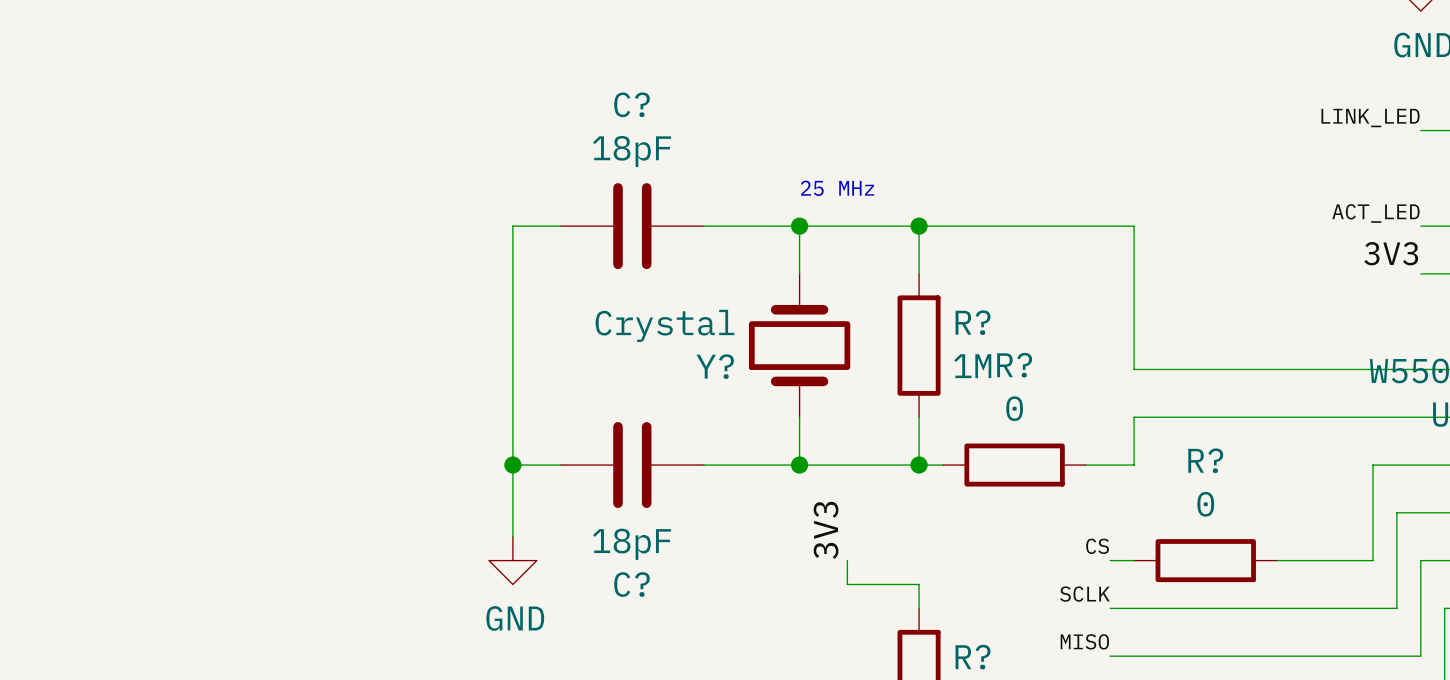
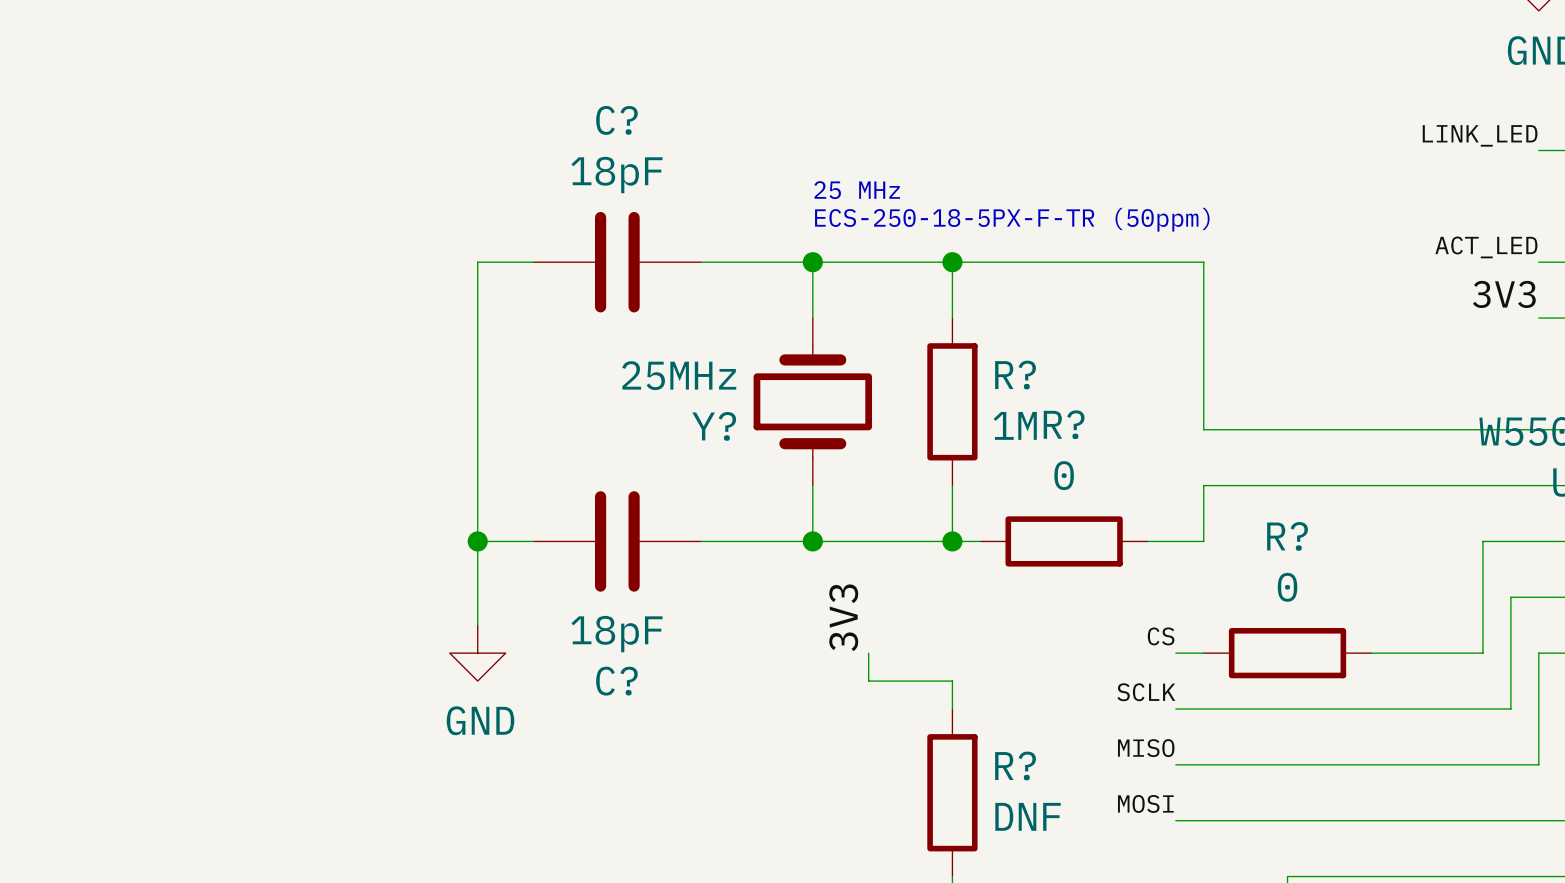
text: none -> 25 MHz (857, 190)
text: 25 MHz (837, 188) -> ECS-250-18-5PX-F-TR (50ppm) (1012, 219)
Y? value: Crystal (664, 325) -> 25MHz (679, 375)

